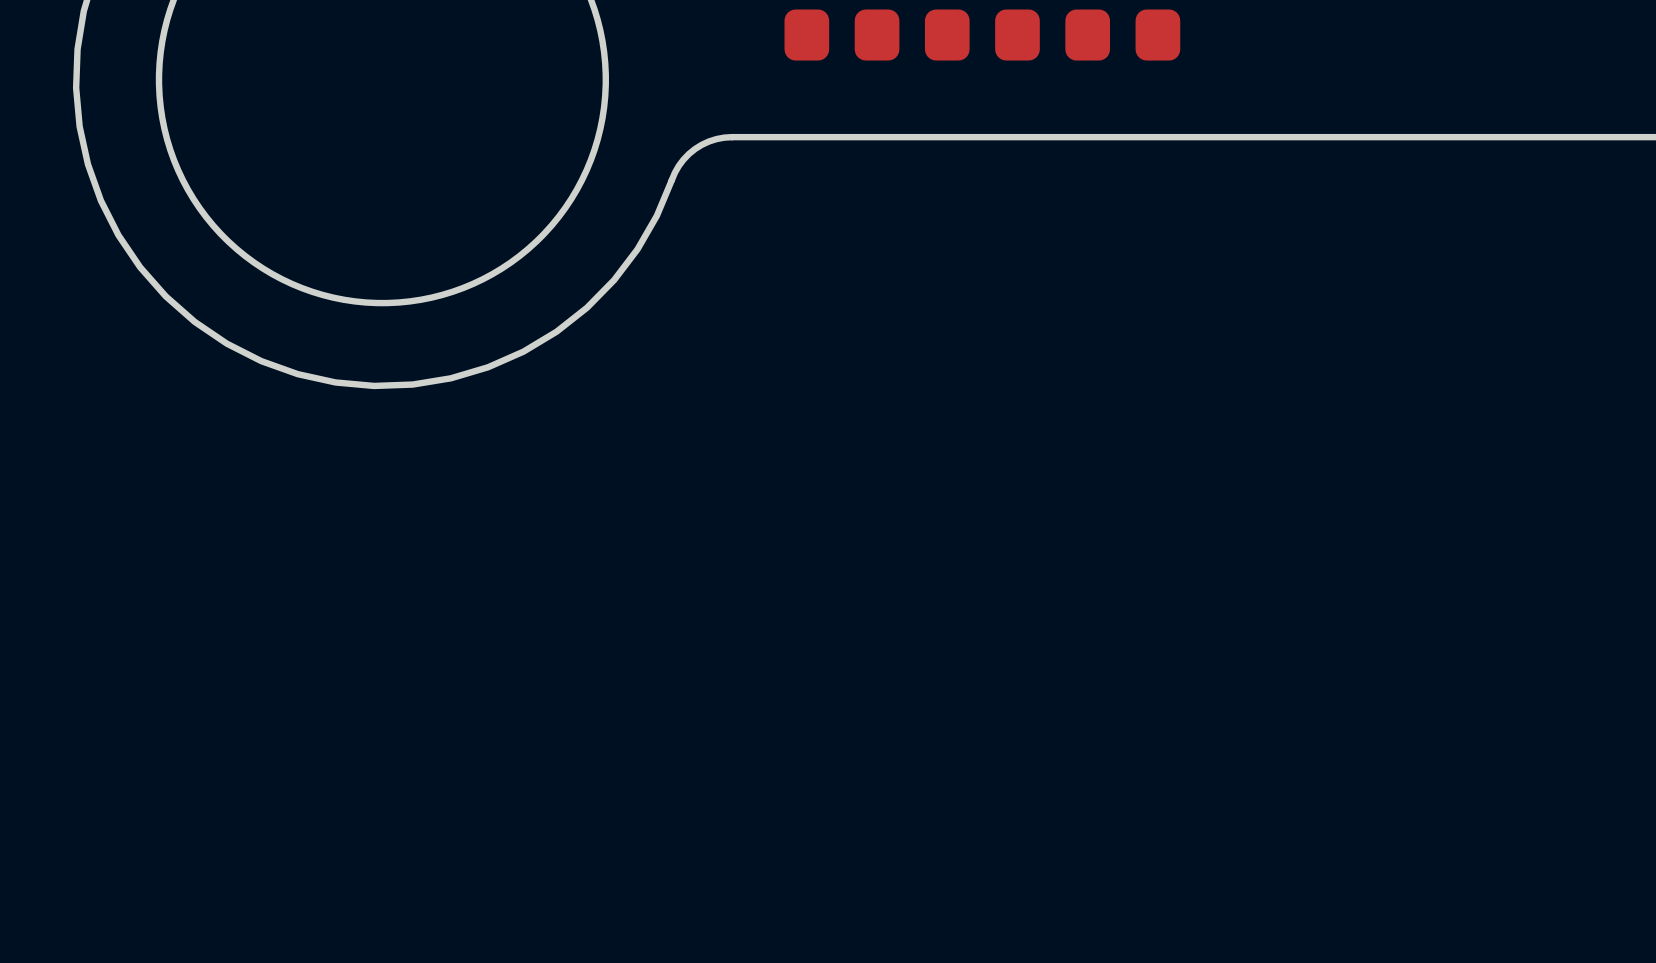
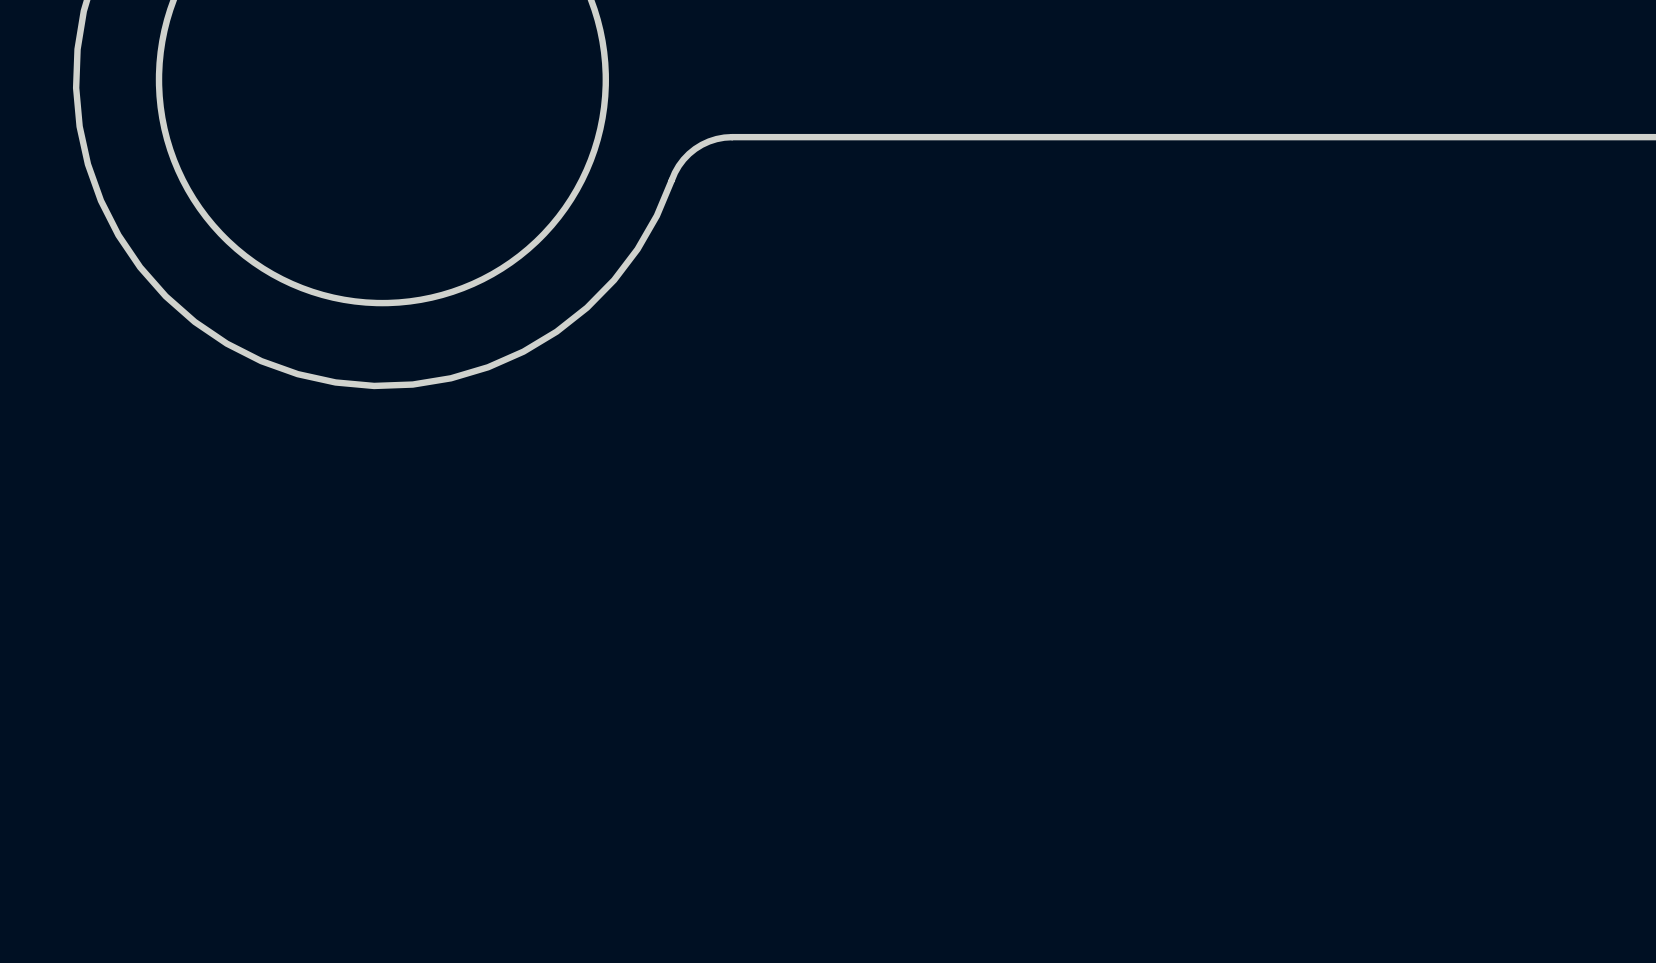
part: (841, 35) -> none
part: (982, 35) -> none
part: (1122, 35) -> none

